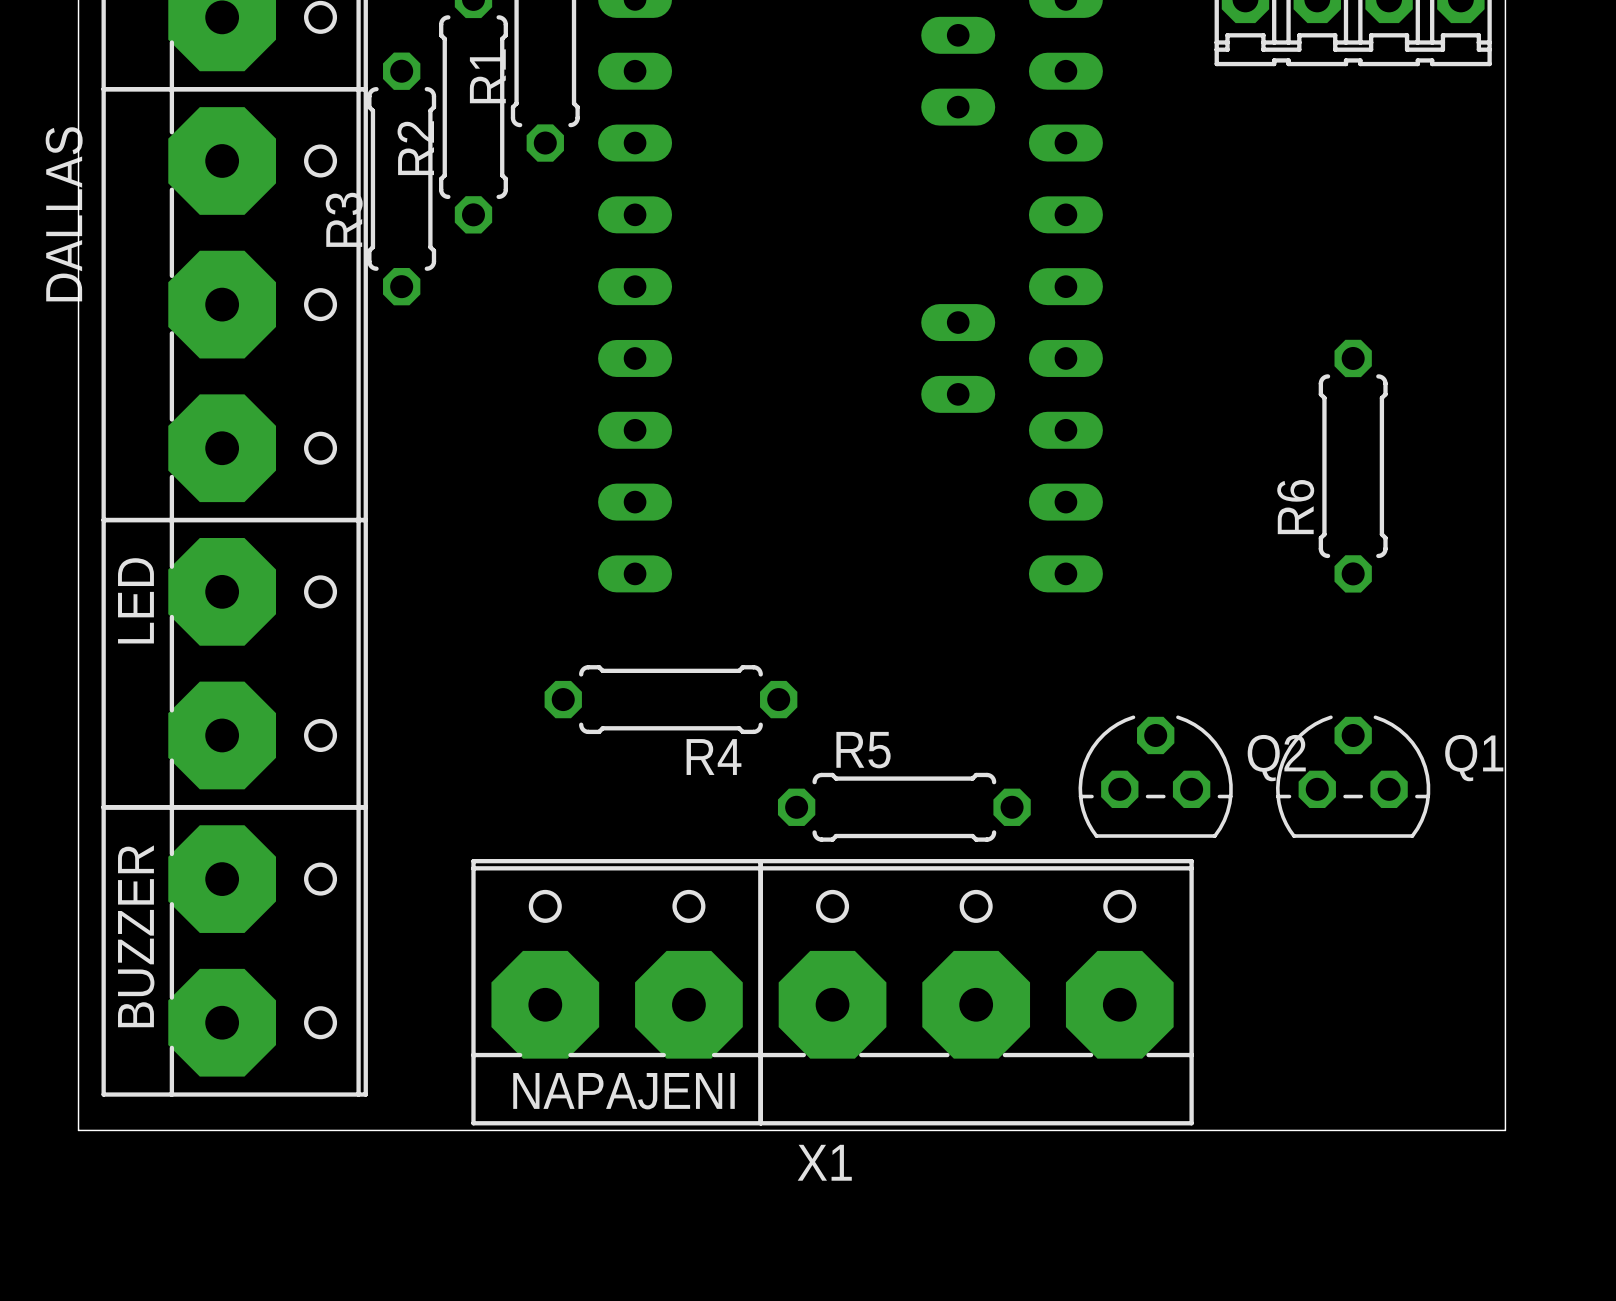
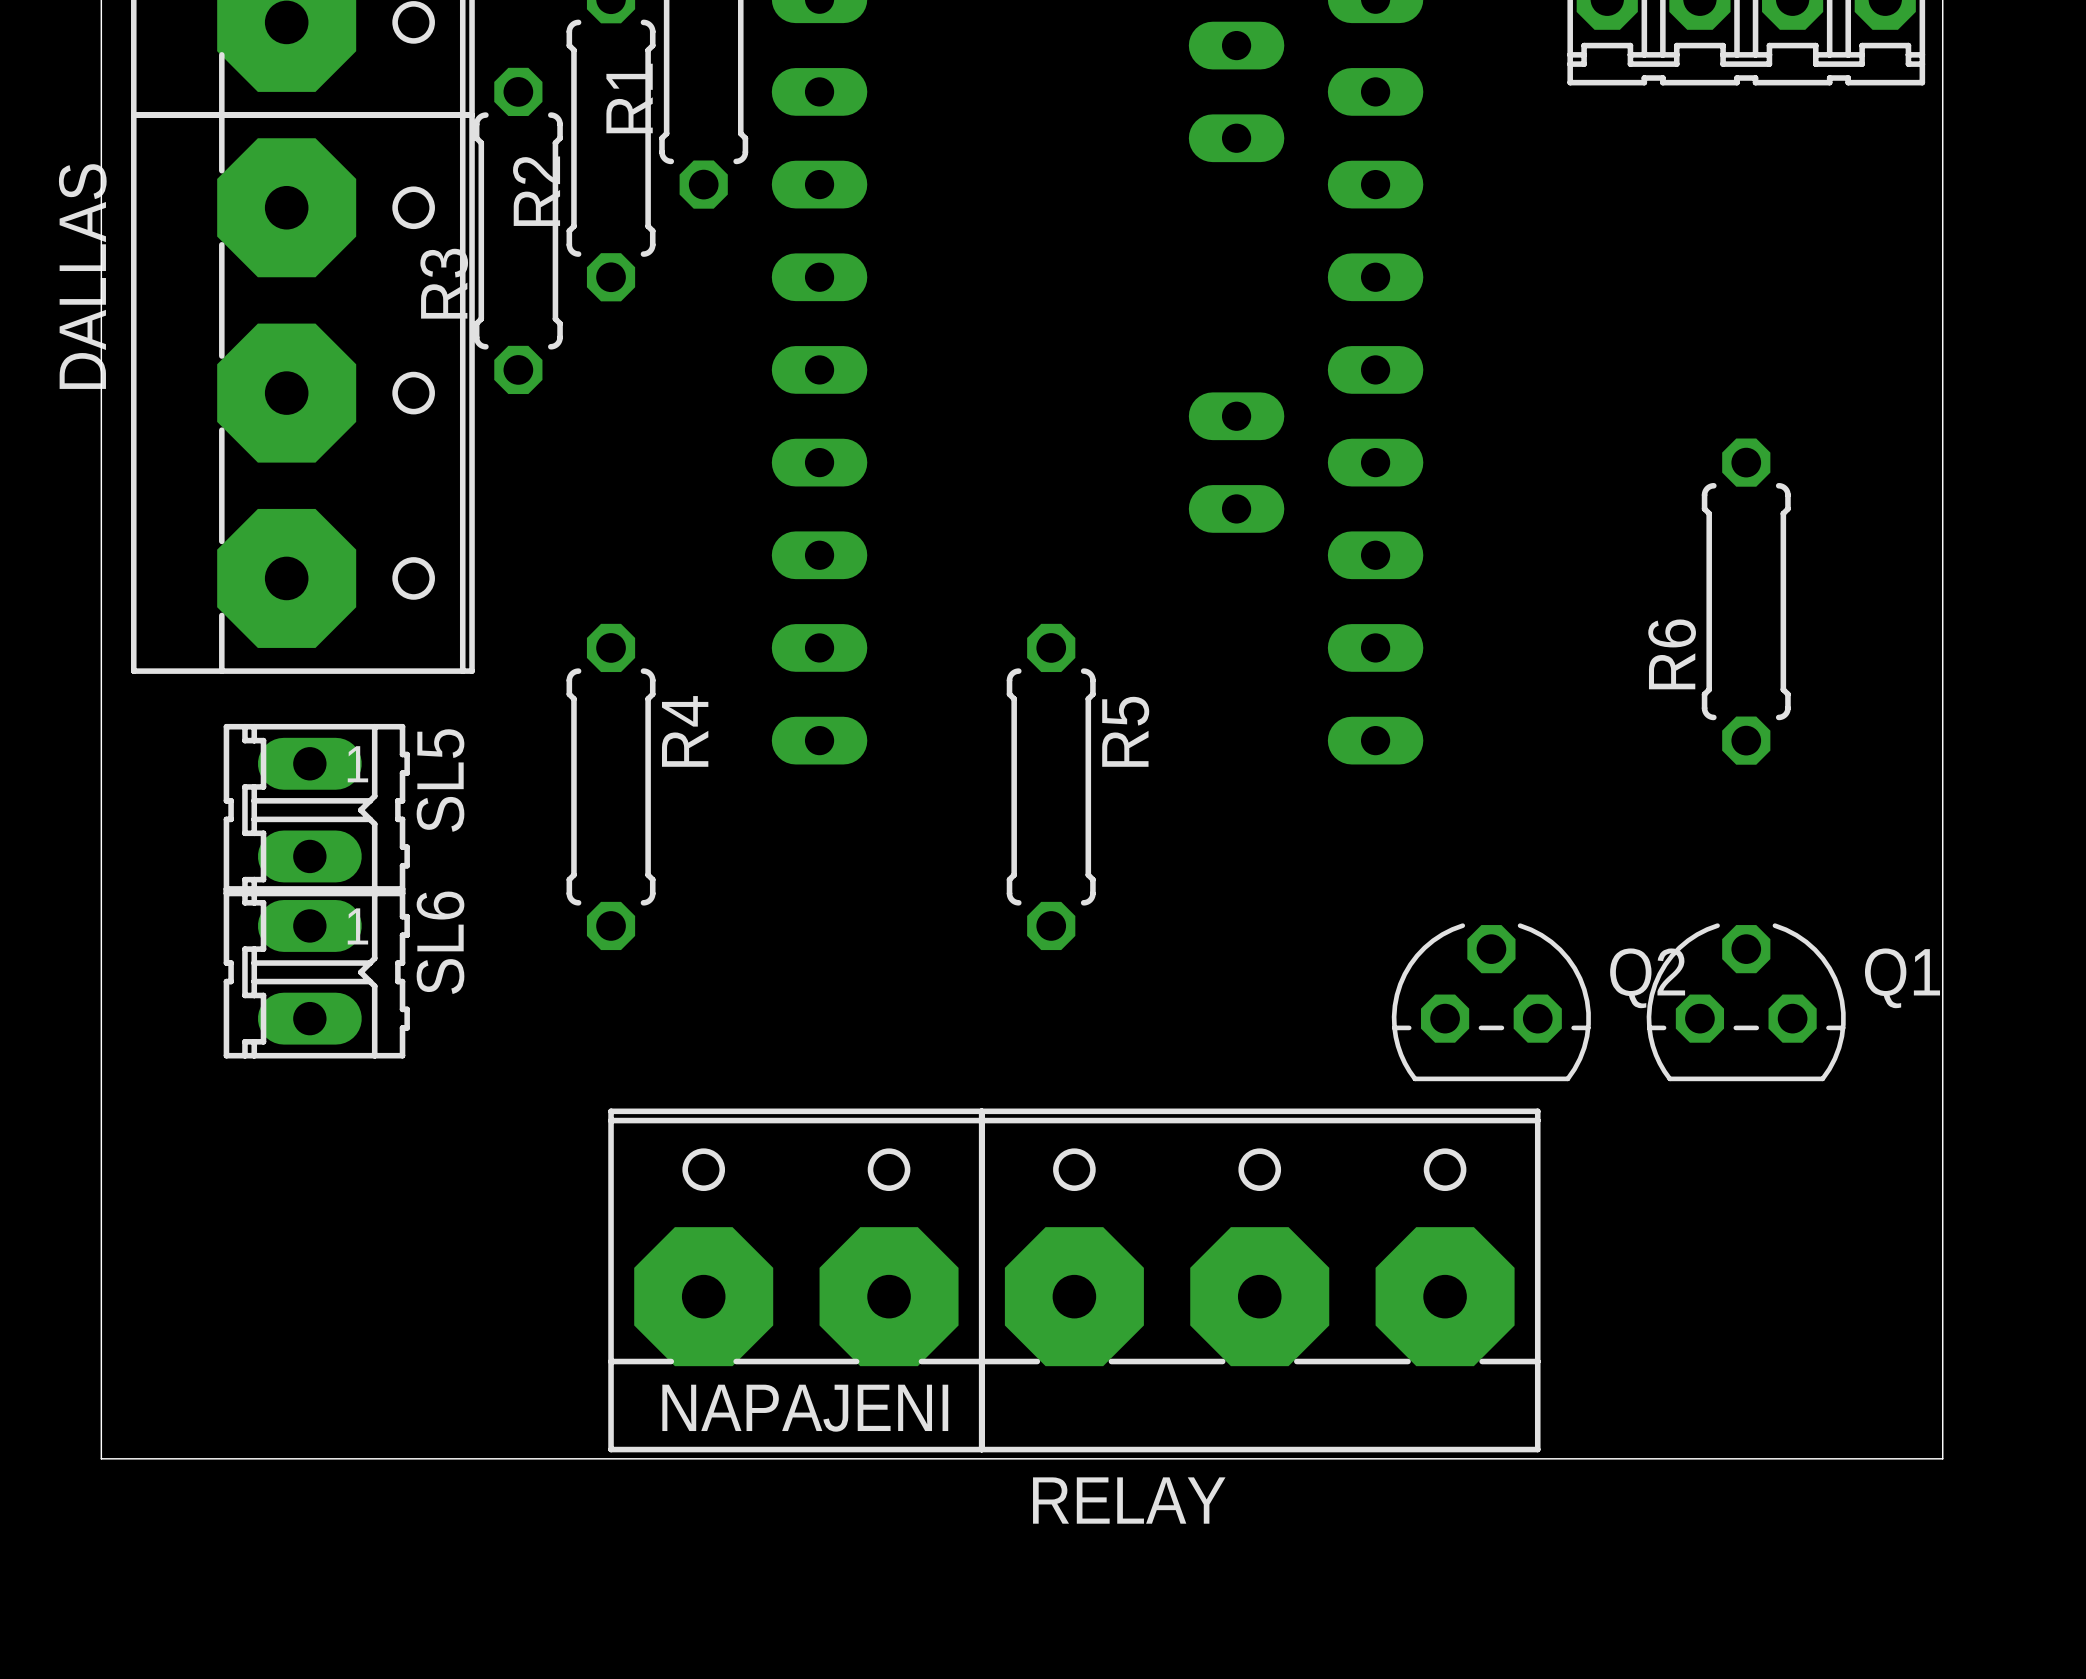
SL5: none -> (316, 810)
LED: (234, 663) -> none
R4 rotation: 0° (670, 699) -> 90° clockwise (611, 786)
R4 position: (670, 699) -> (611, 786)
SL6: none -> (316, 972)
R4 name position: R4 (714, 757) -> R4 (685, 731)
R5 rotation: 0° (904, 807) -> 90° clockwise (1051, 786)
R5 position: (904, 807) -> (1051, 786)
BUZZER: (234, 950) -> none
X1 name: X1 (824, 1162) -> RELAY (1129, 1500)

